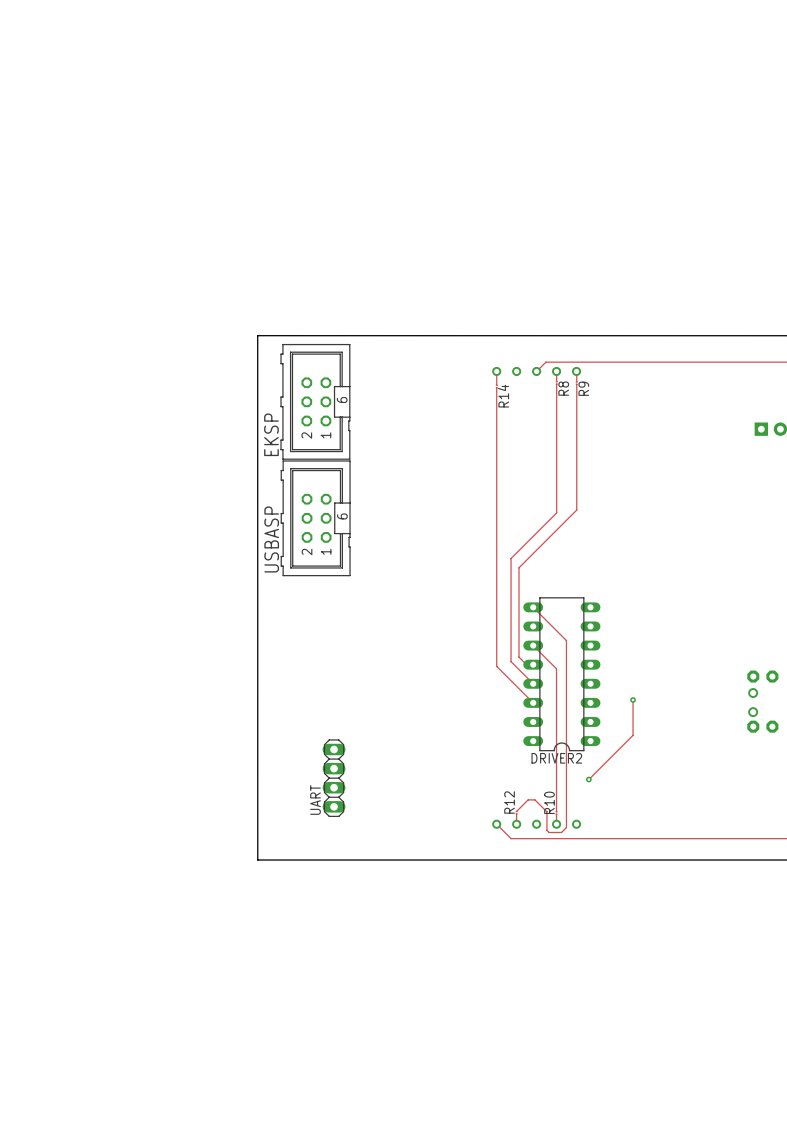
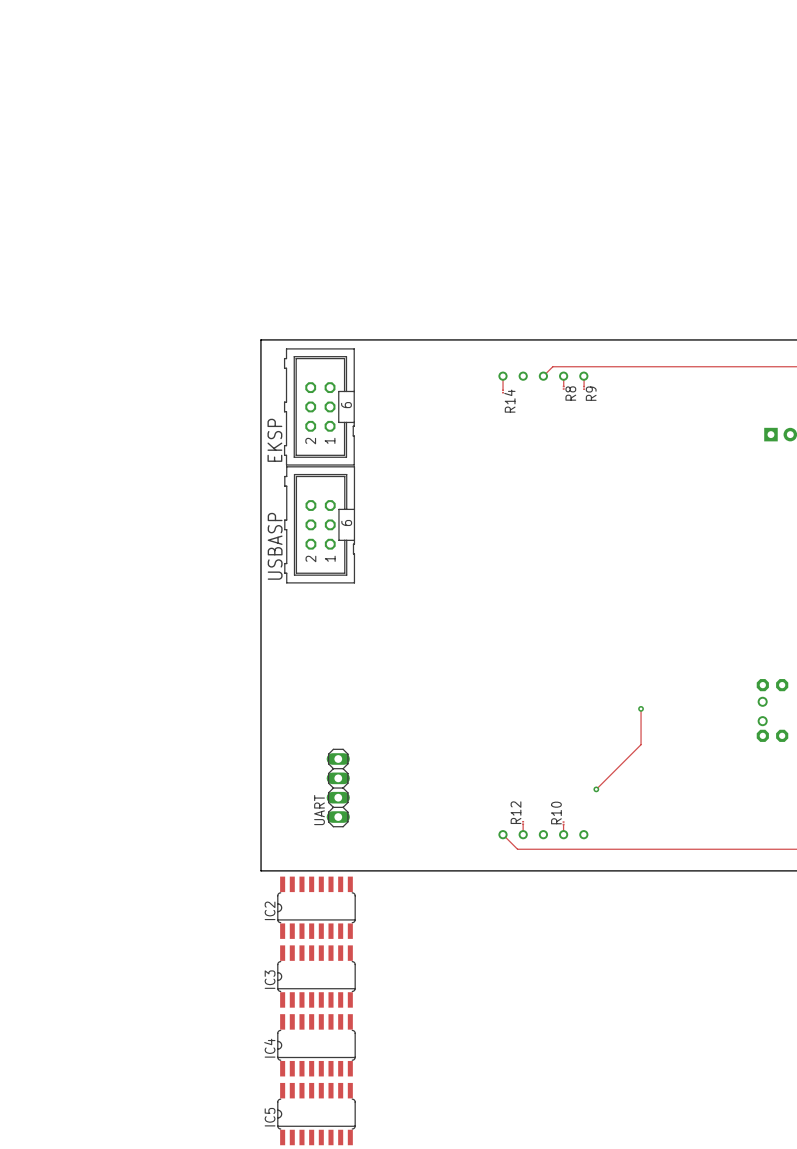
track: (556, 384) (556, 512) (511, 558) (511, 661) (533, 683) -> none
track: (576, 384) (576, 510) (518, 567) (518, 657) (526, 664) (533, 664) -> none
track: (496, 387) (496, 666) (533, 702) -> none
track: (533, 607) (566, 640) (566, 827) (561, 832) (549, 832) (546, 830) (546, 811) (534, 799) (528, 799) (516, 811) -> none
track: (533, 645) (556, 668) (556, 811) -> none
DRIVER2: (561, 674) -> none
IC2: none -> (316, 907)
IC3: none -> (316, 976)
IC4: none -> (316, 1045)
IC5: none -> (316, 1114)

